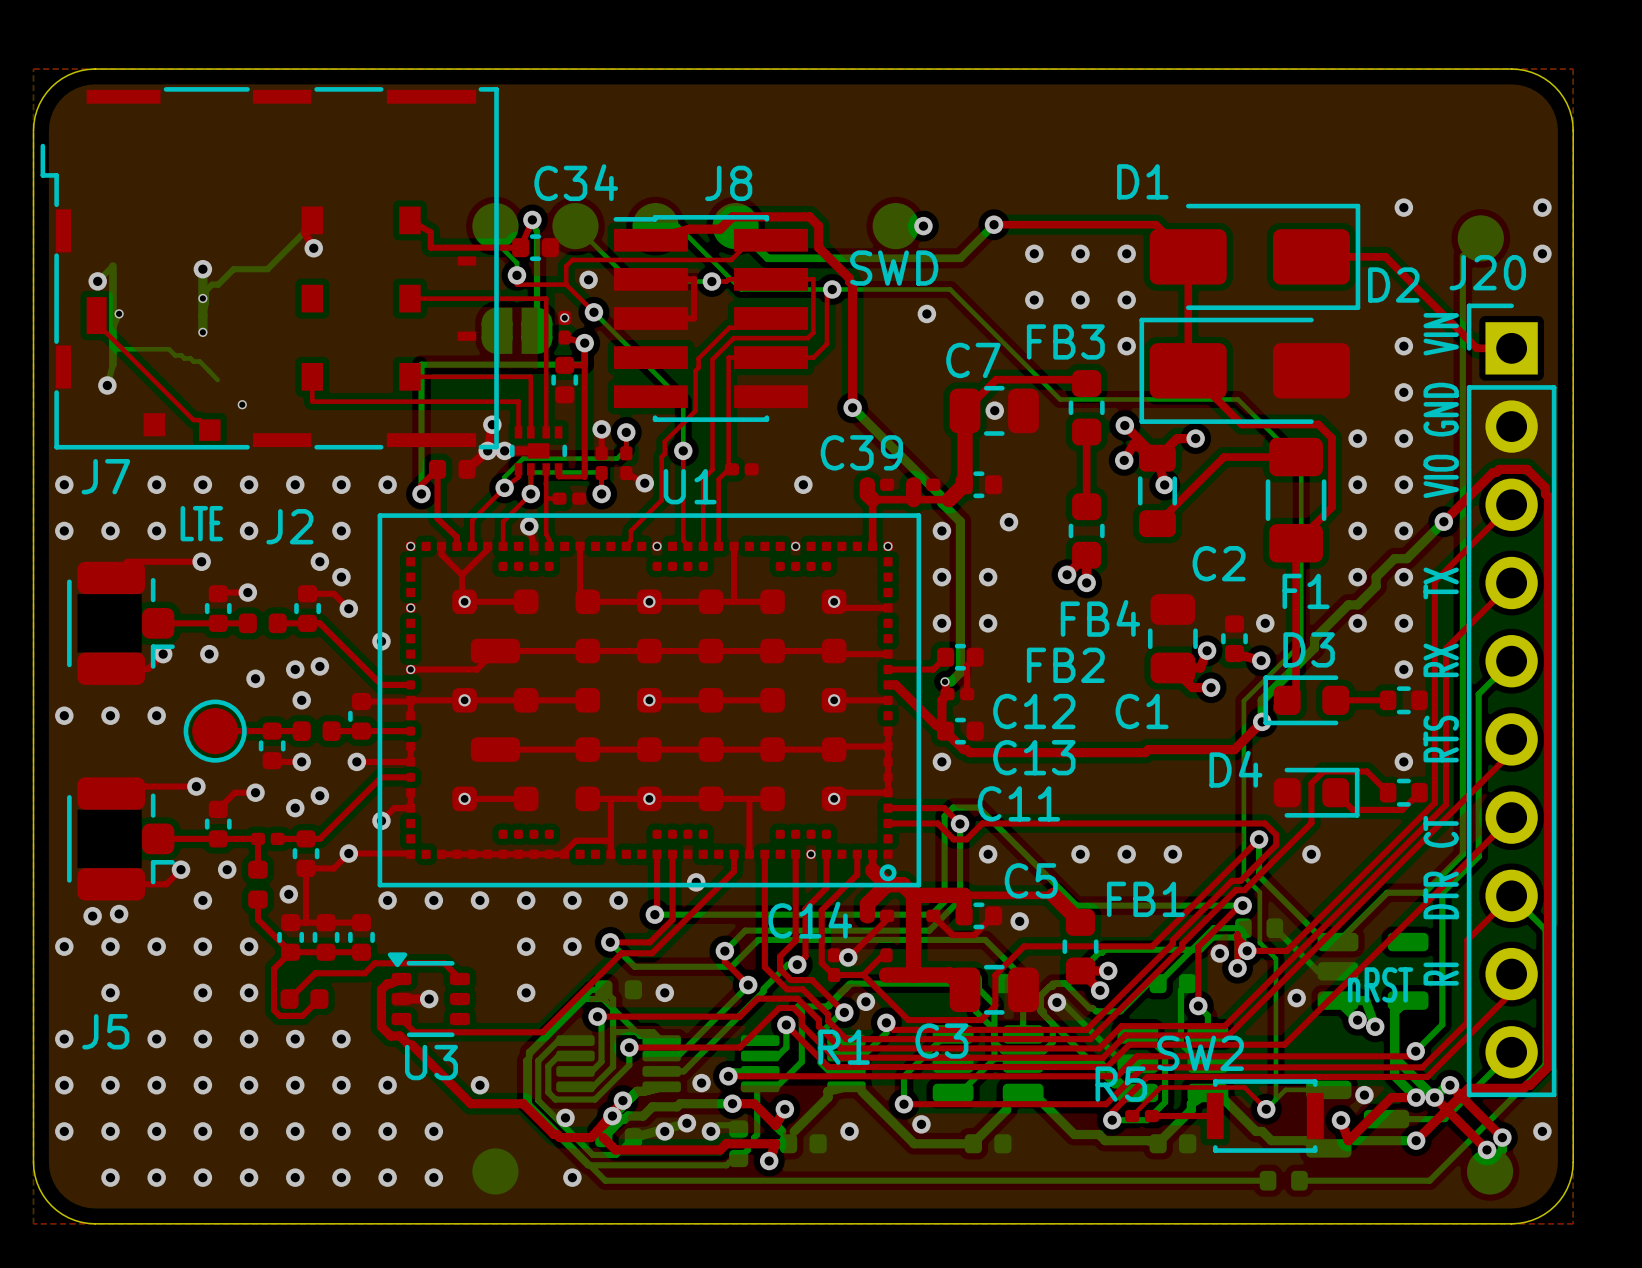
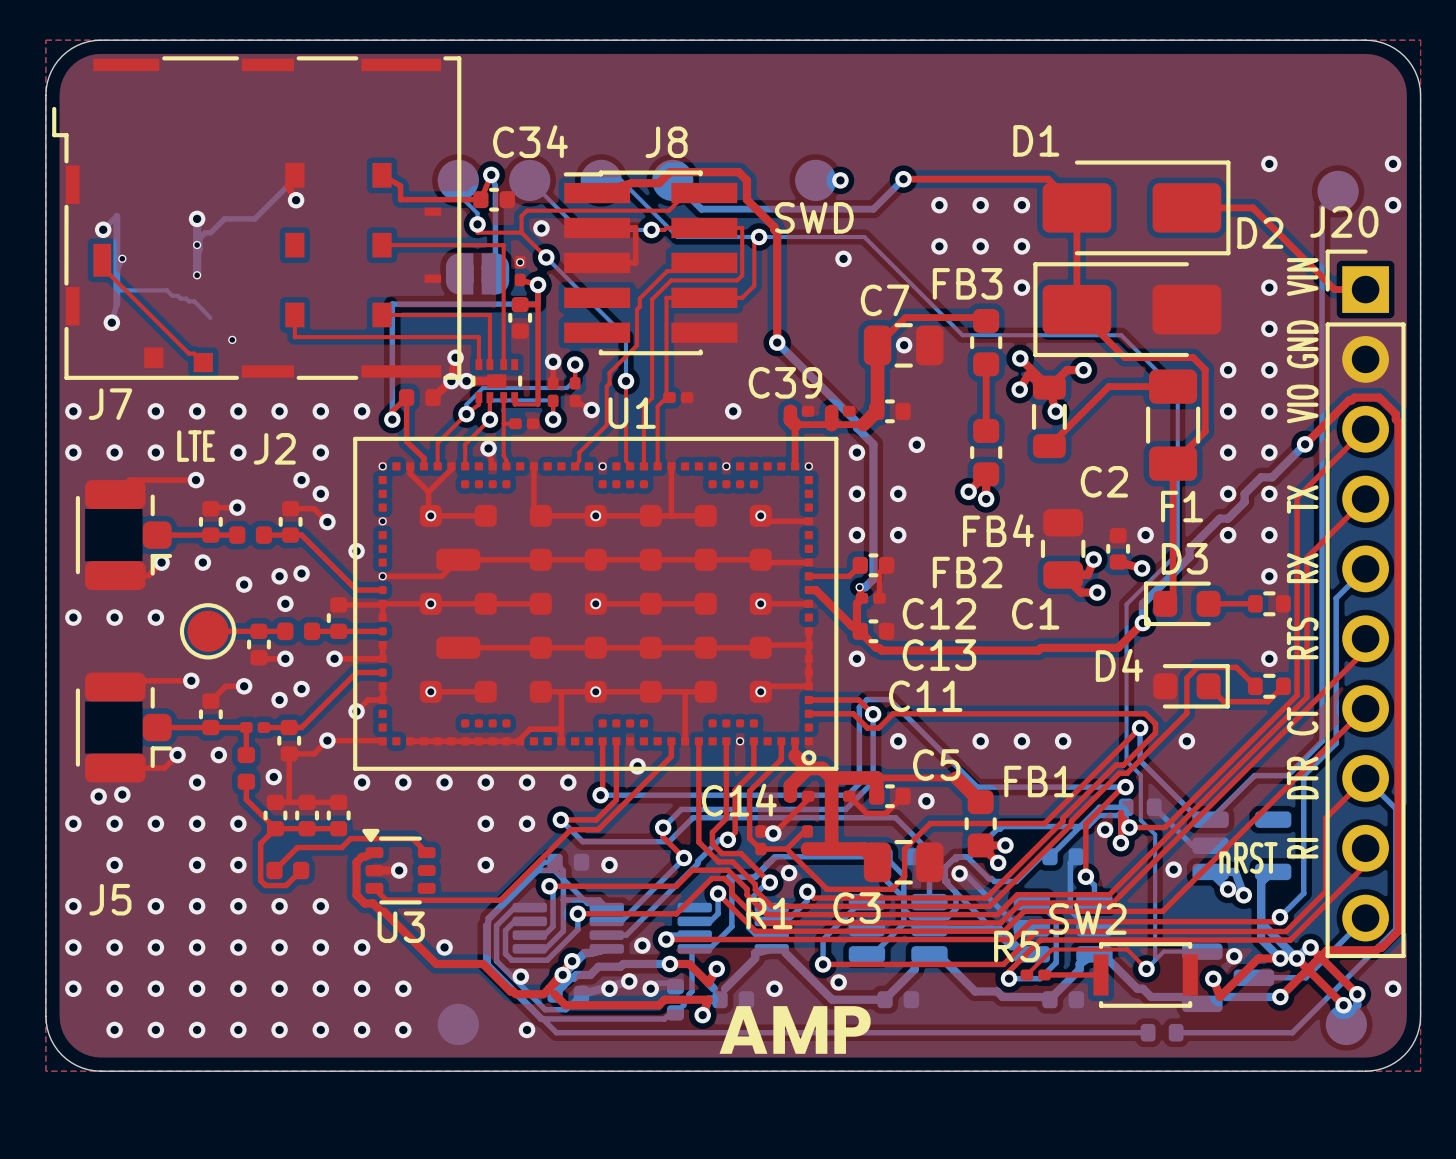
drawing: none -> [719, 1006, 871, 1054]

